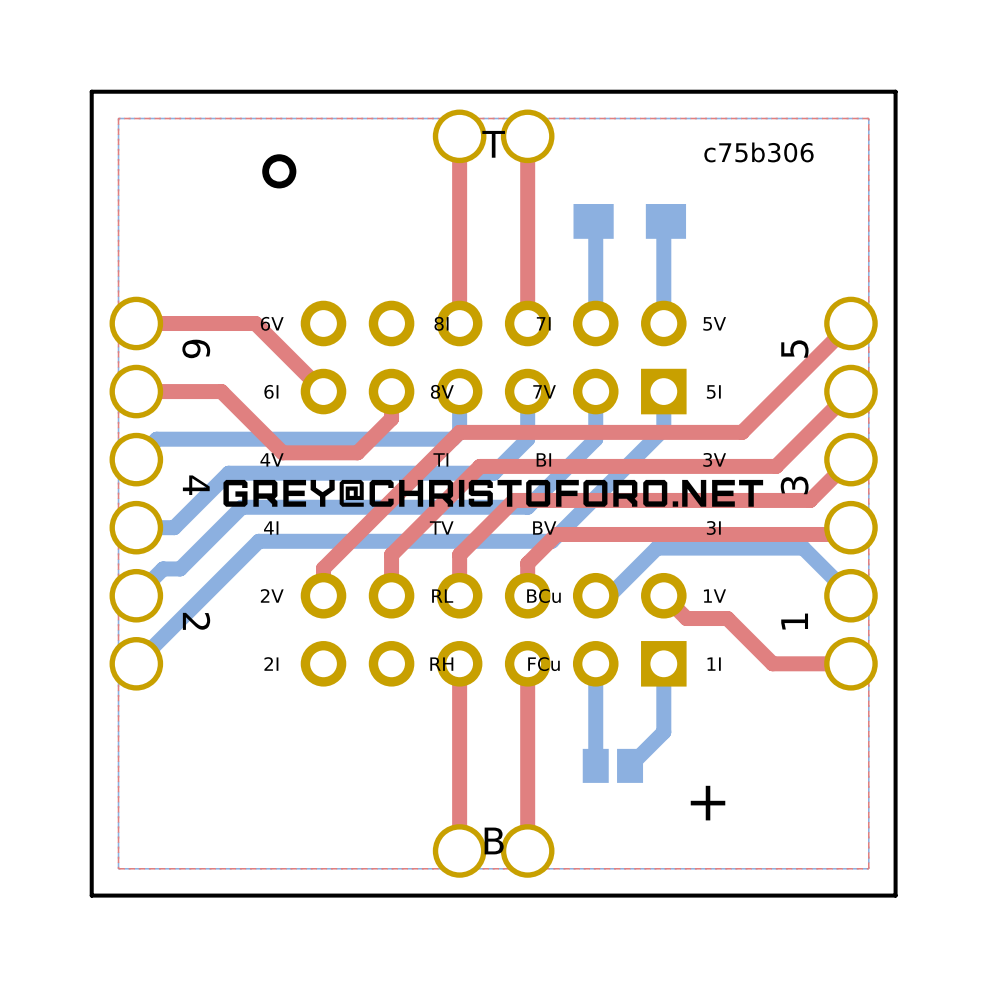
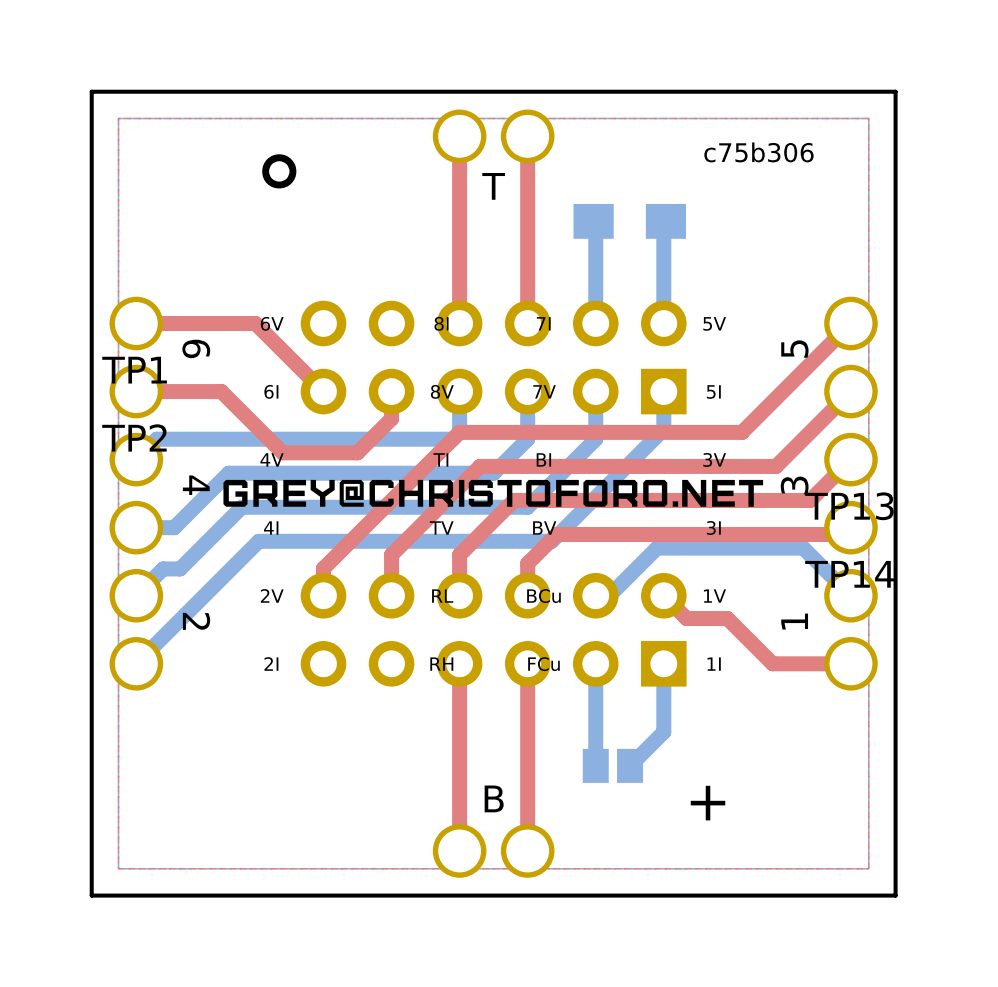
text position: T (493, 144) -> T (493, 186)
TP1 name: none -> TP1 (134, 370)
TP2 name: none -> TP2 (134, 437)
TP13 name: none -> TP13 (849, 506)
TP14 name: none -> TP14 (849, 574)
text position: B (494, 840) -> B (494, 798)

